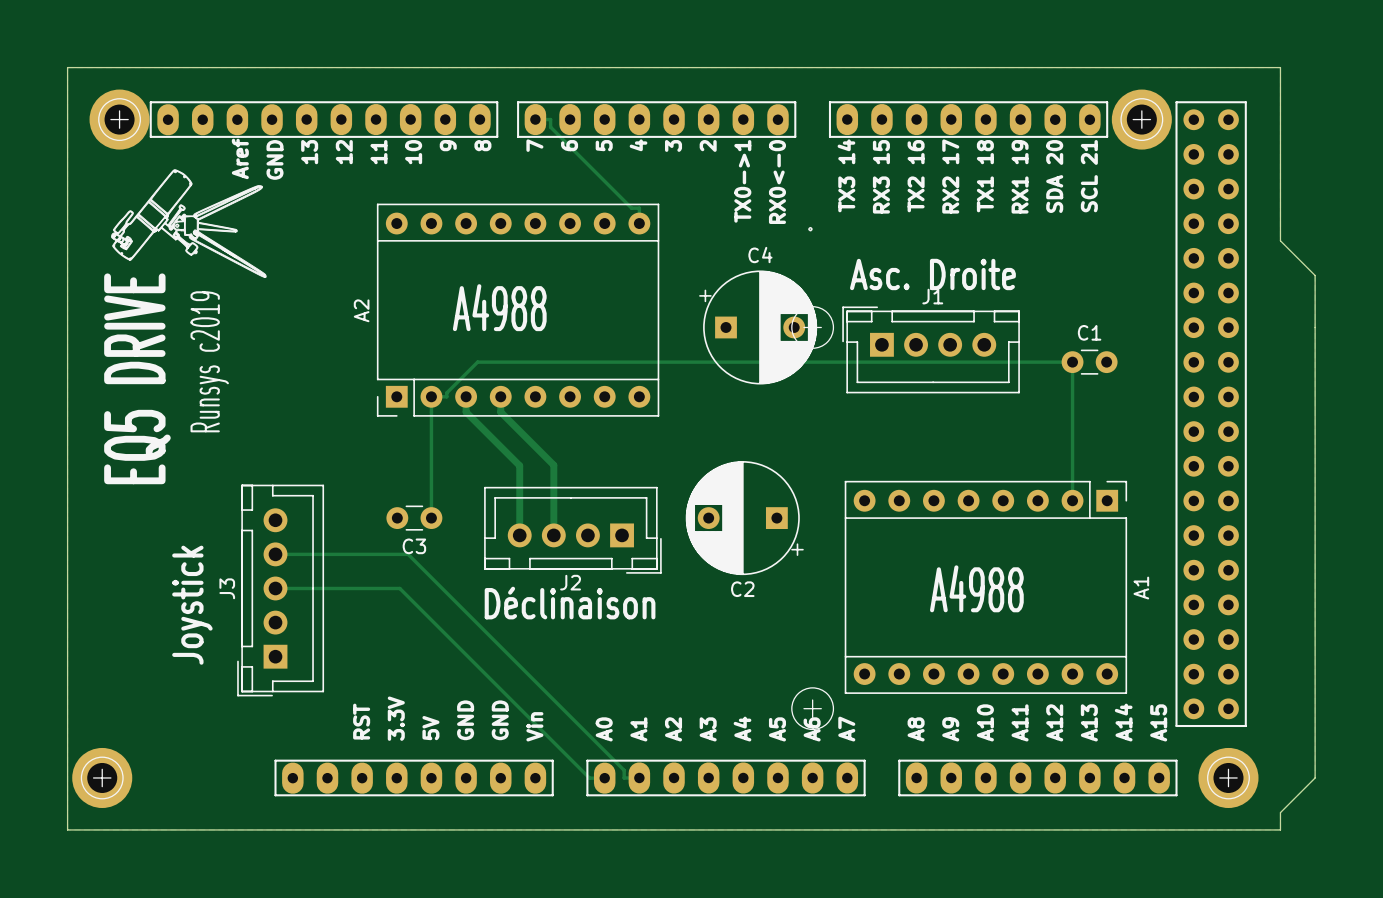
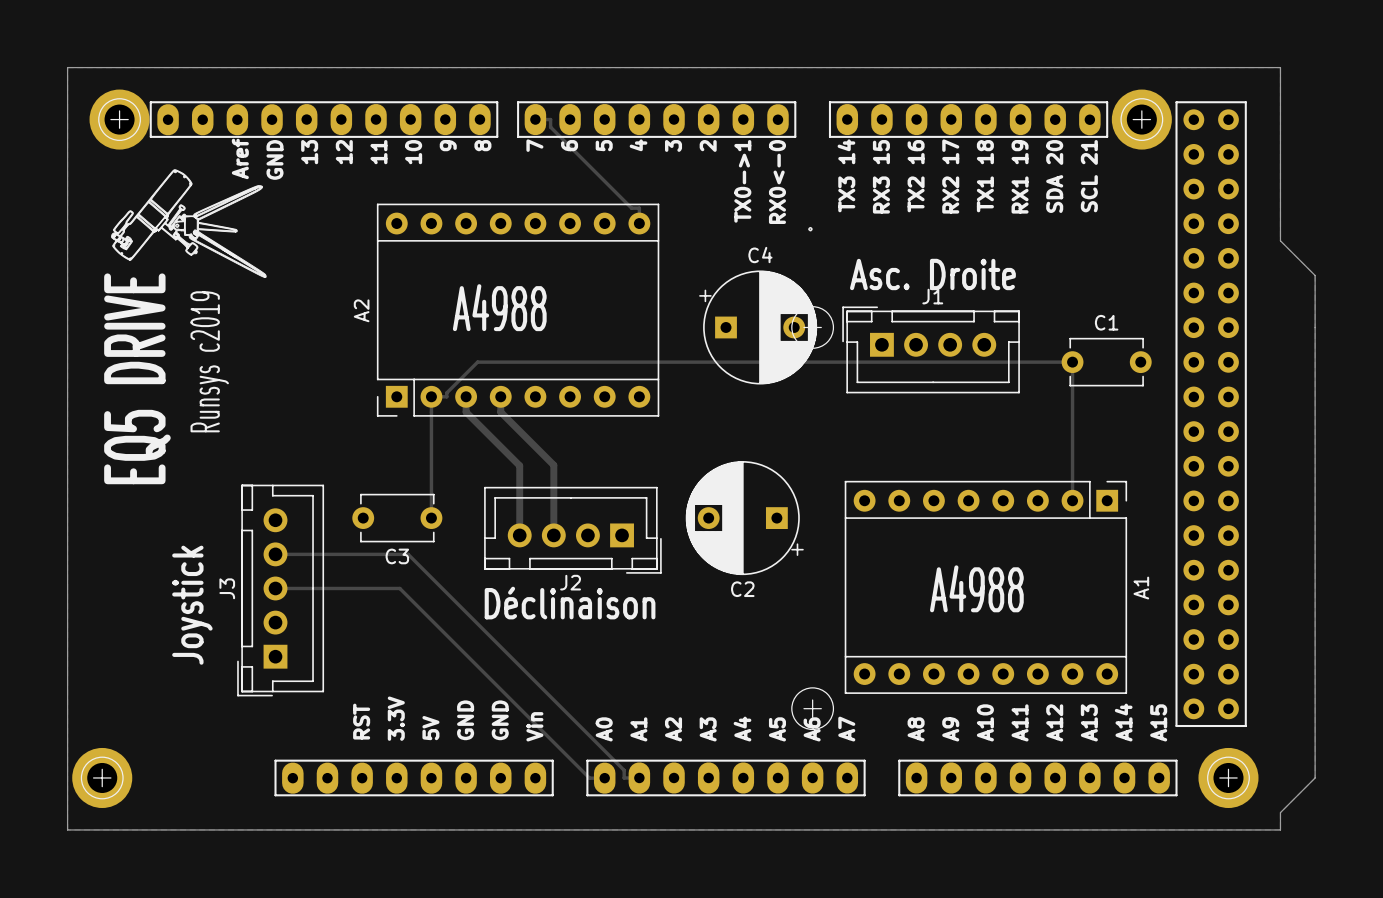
C1 footprint: [1061, 349, 1118, 375] -> [1061, 337, 1152, 387]
C3 footprint: [386, 505, 443, 531] -> [352, 493, 443, 543]

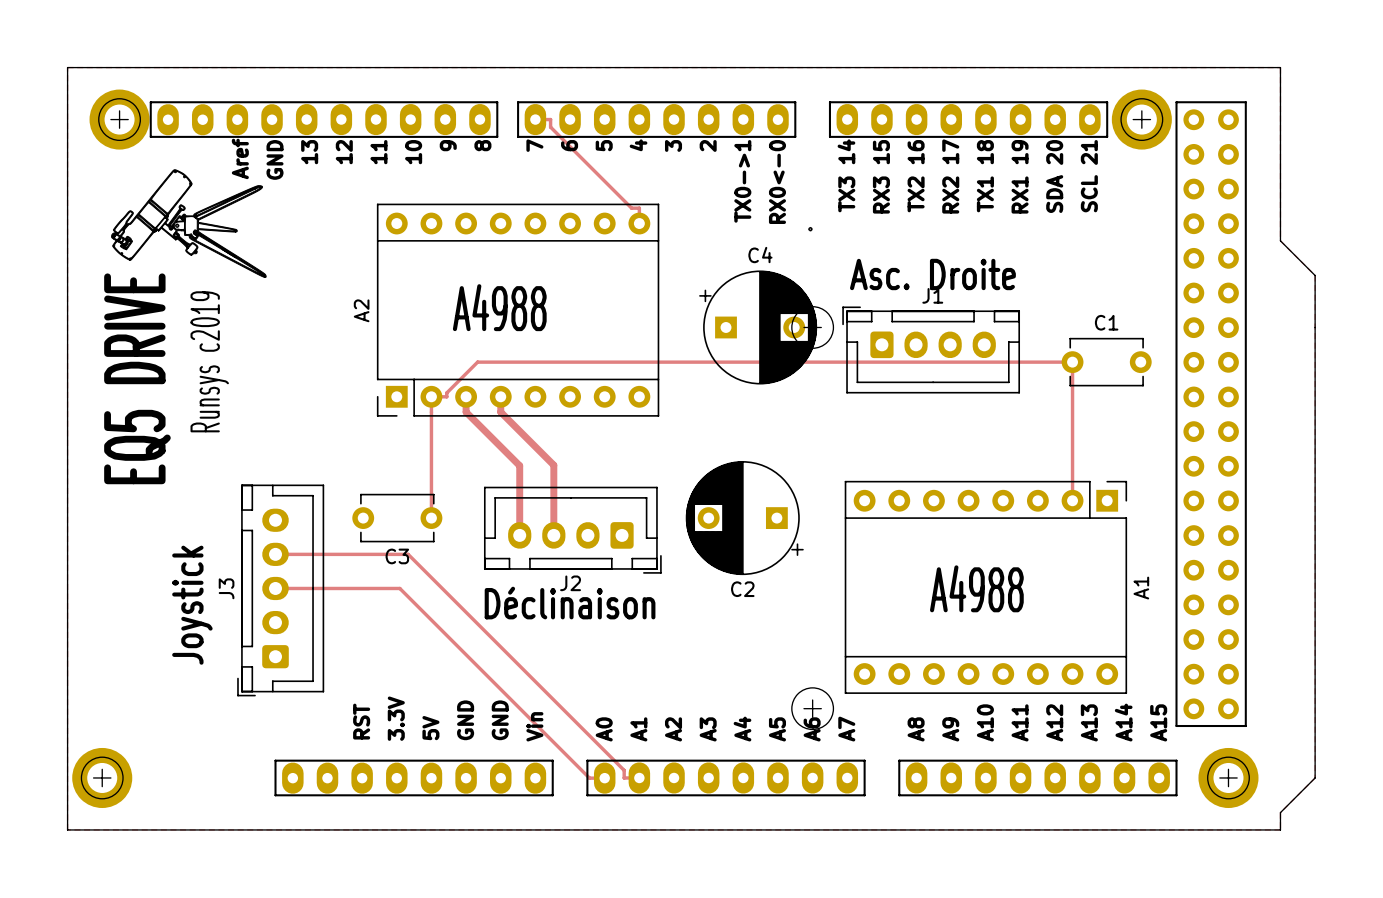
J1 footprint: [842, 306, 1020, 394] -> [842, 306, 1021, 394]
J3 footprint: [237, 484, 325, 697] -> [237, 484, 325, 697]
J2 footprint: [484, 486, 662, 574] -> [483, 486, 662, 574]

